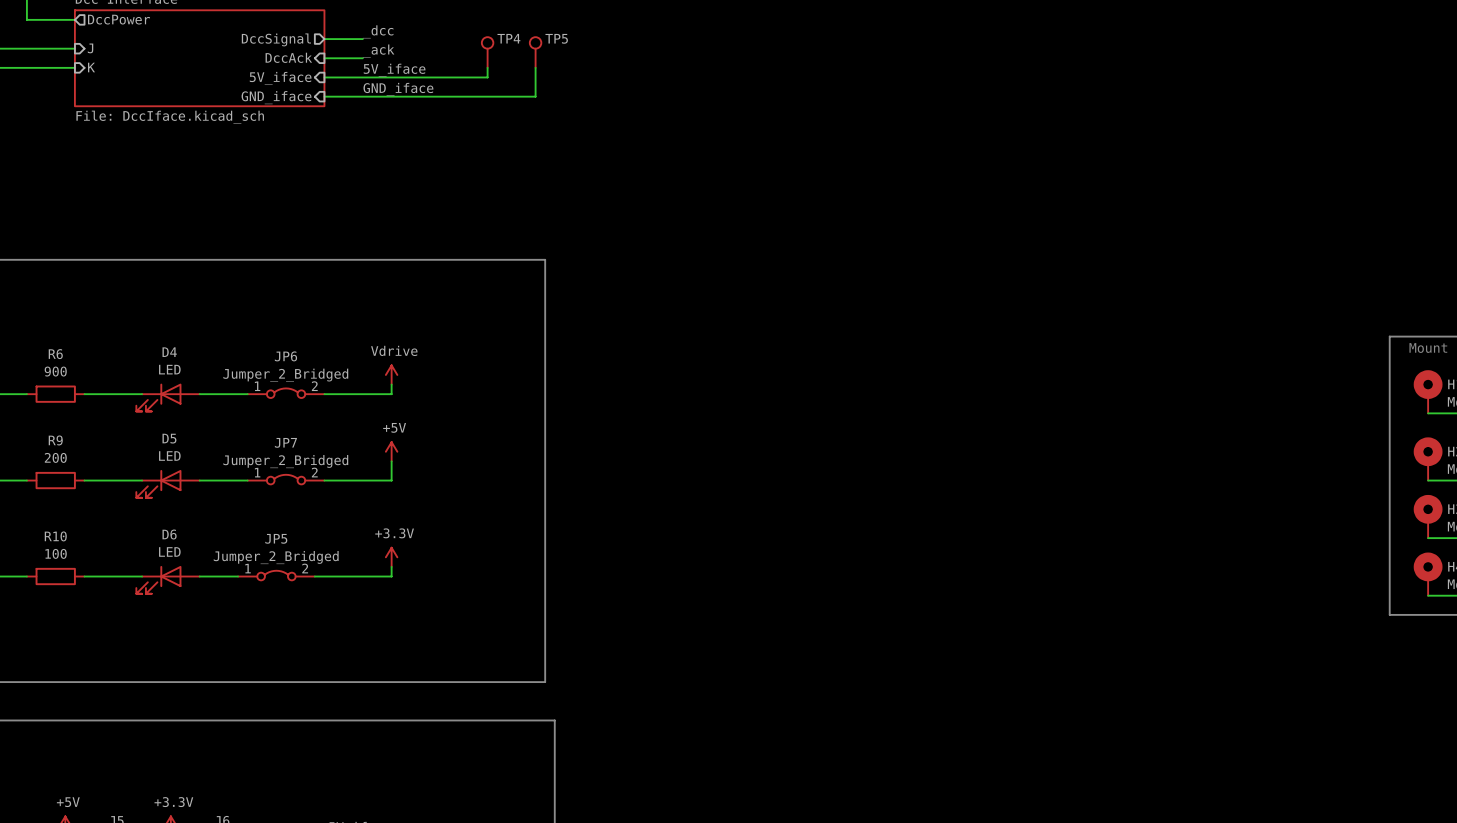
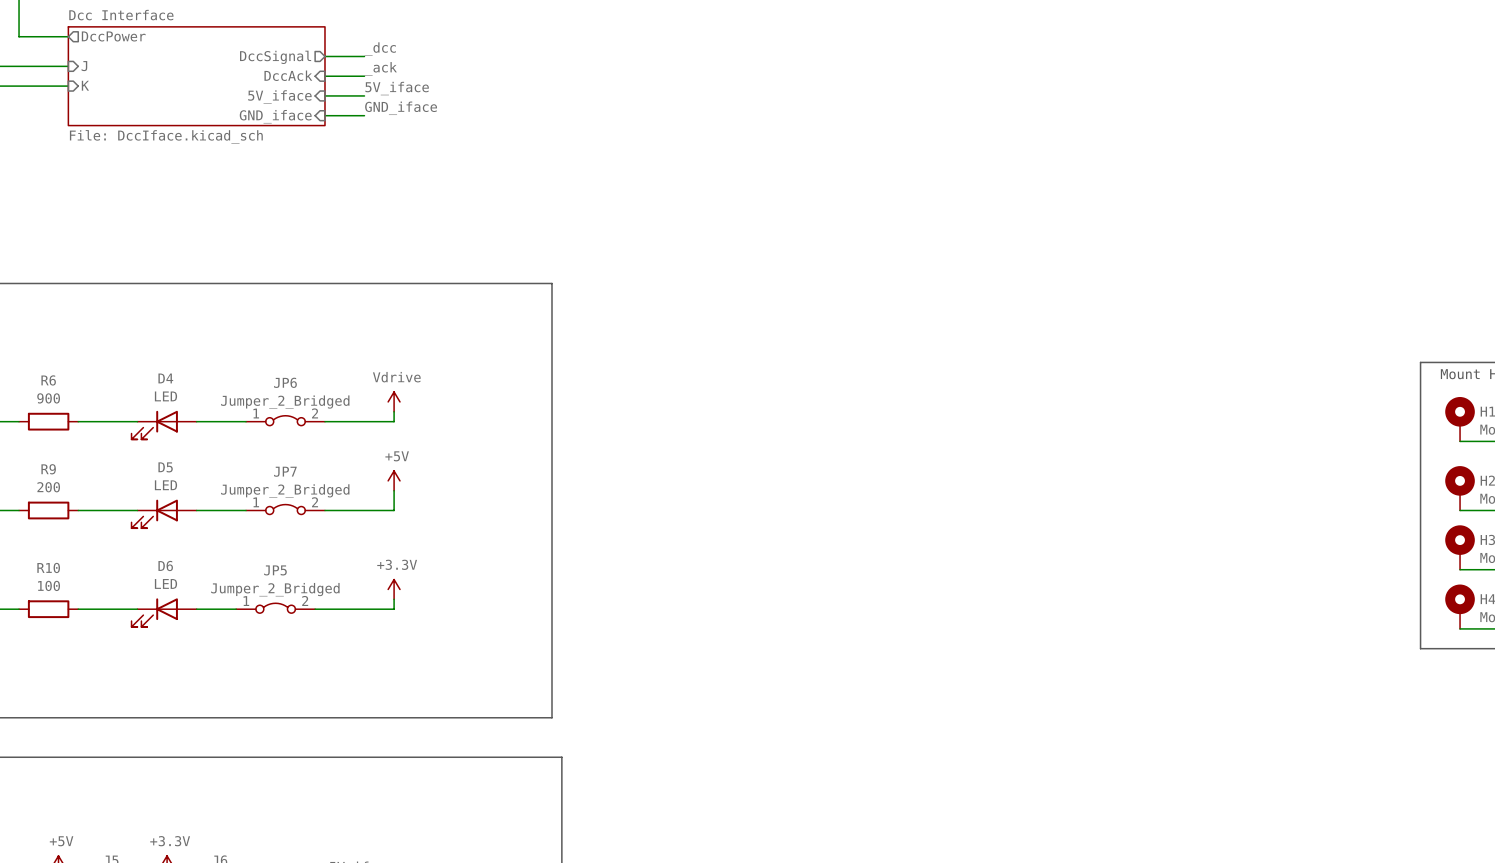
TP4: (487, 52) -> none
TP5: (535, 52) -> none
wire: (487, 67) (487, 77) (362, 77) -> none
wire: (535, 67) (535, 96) (362, 96) -> none

